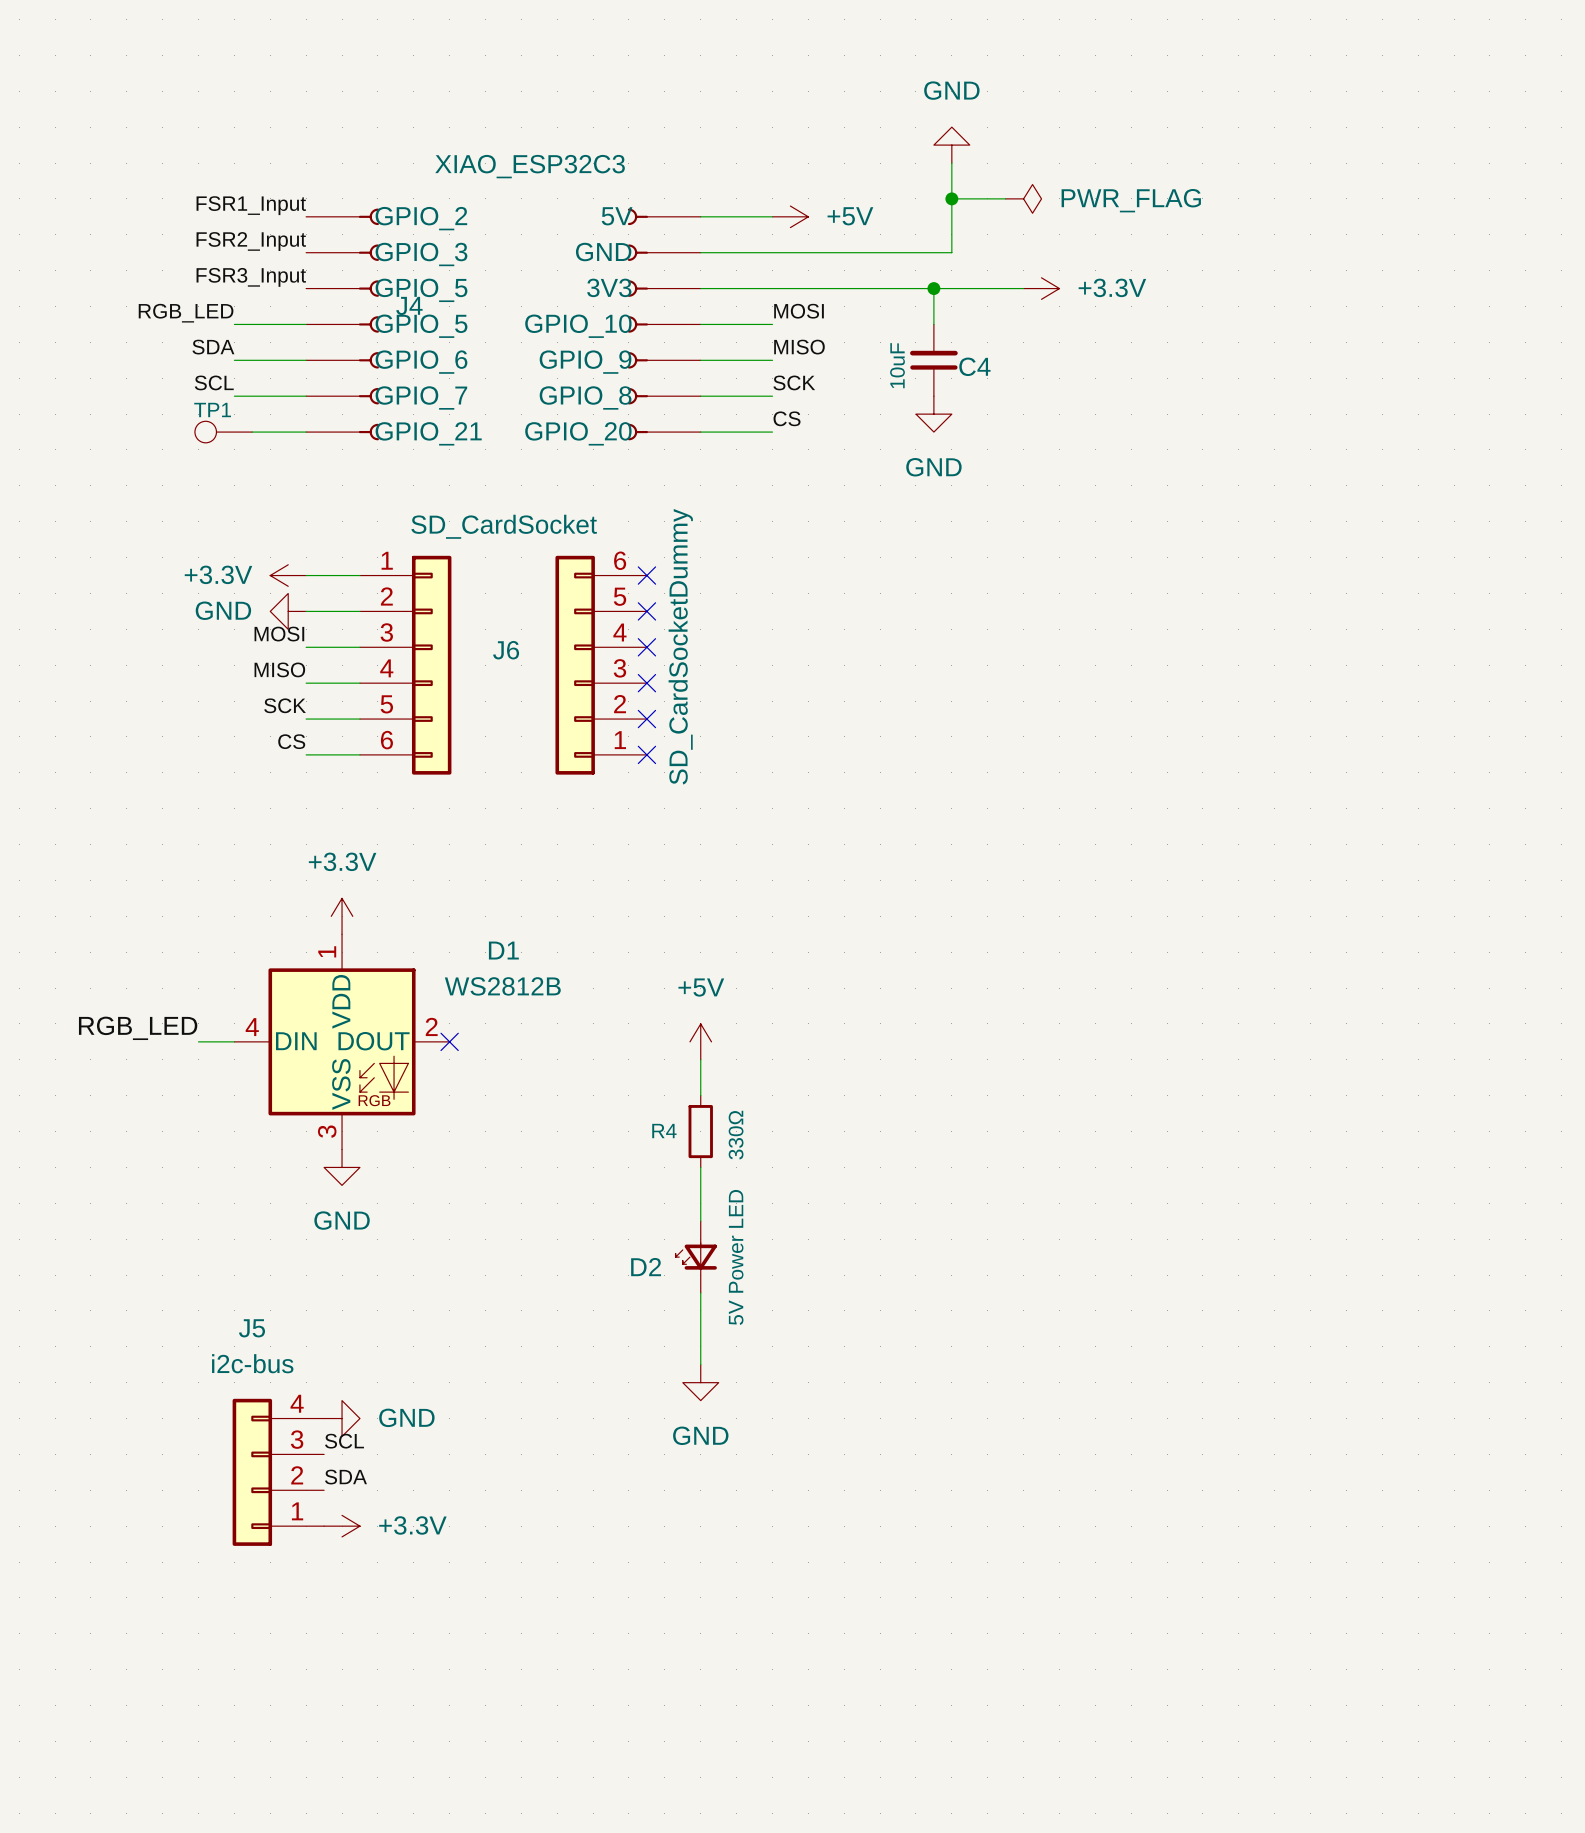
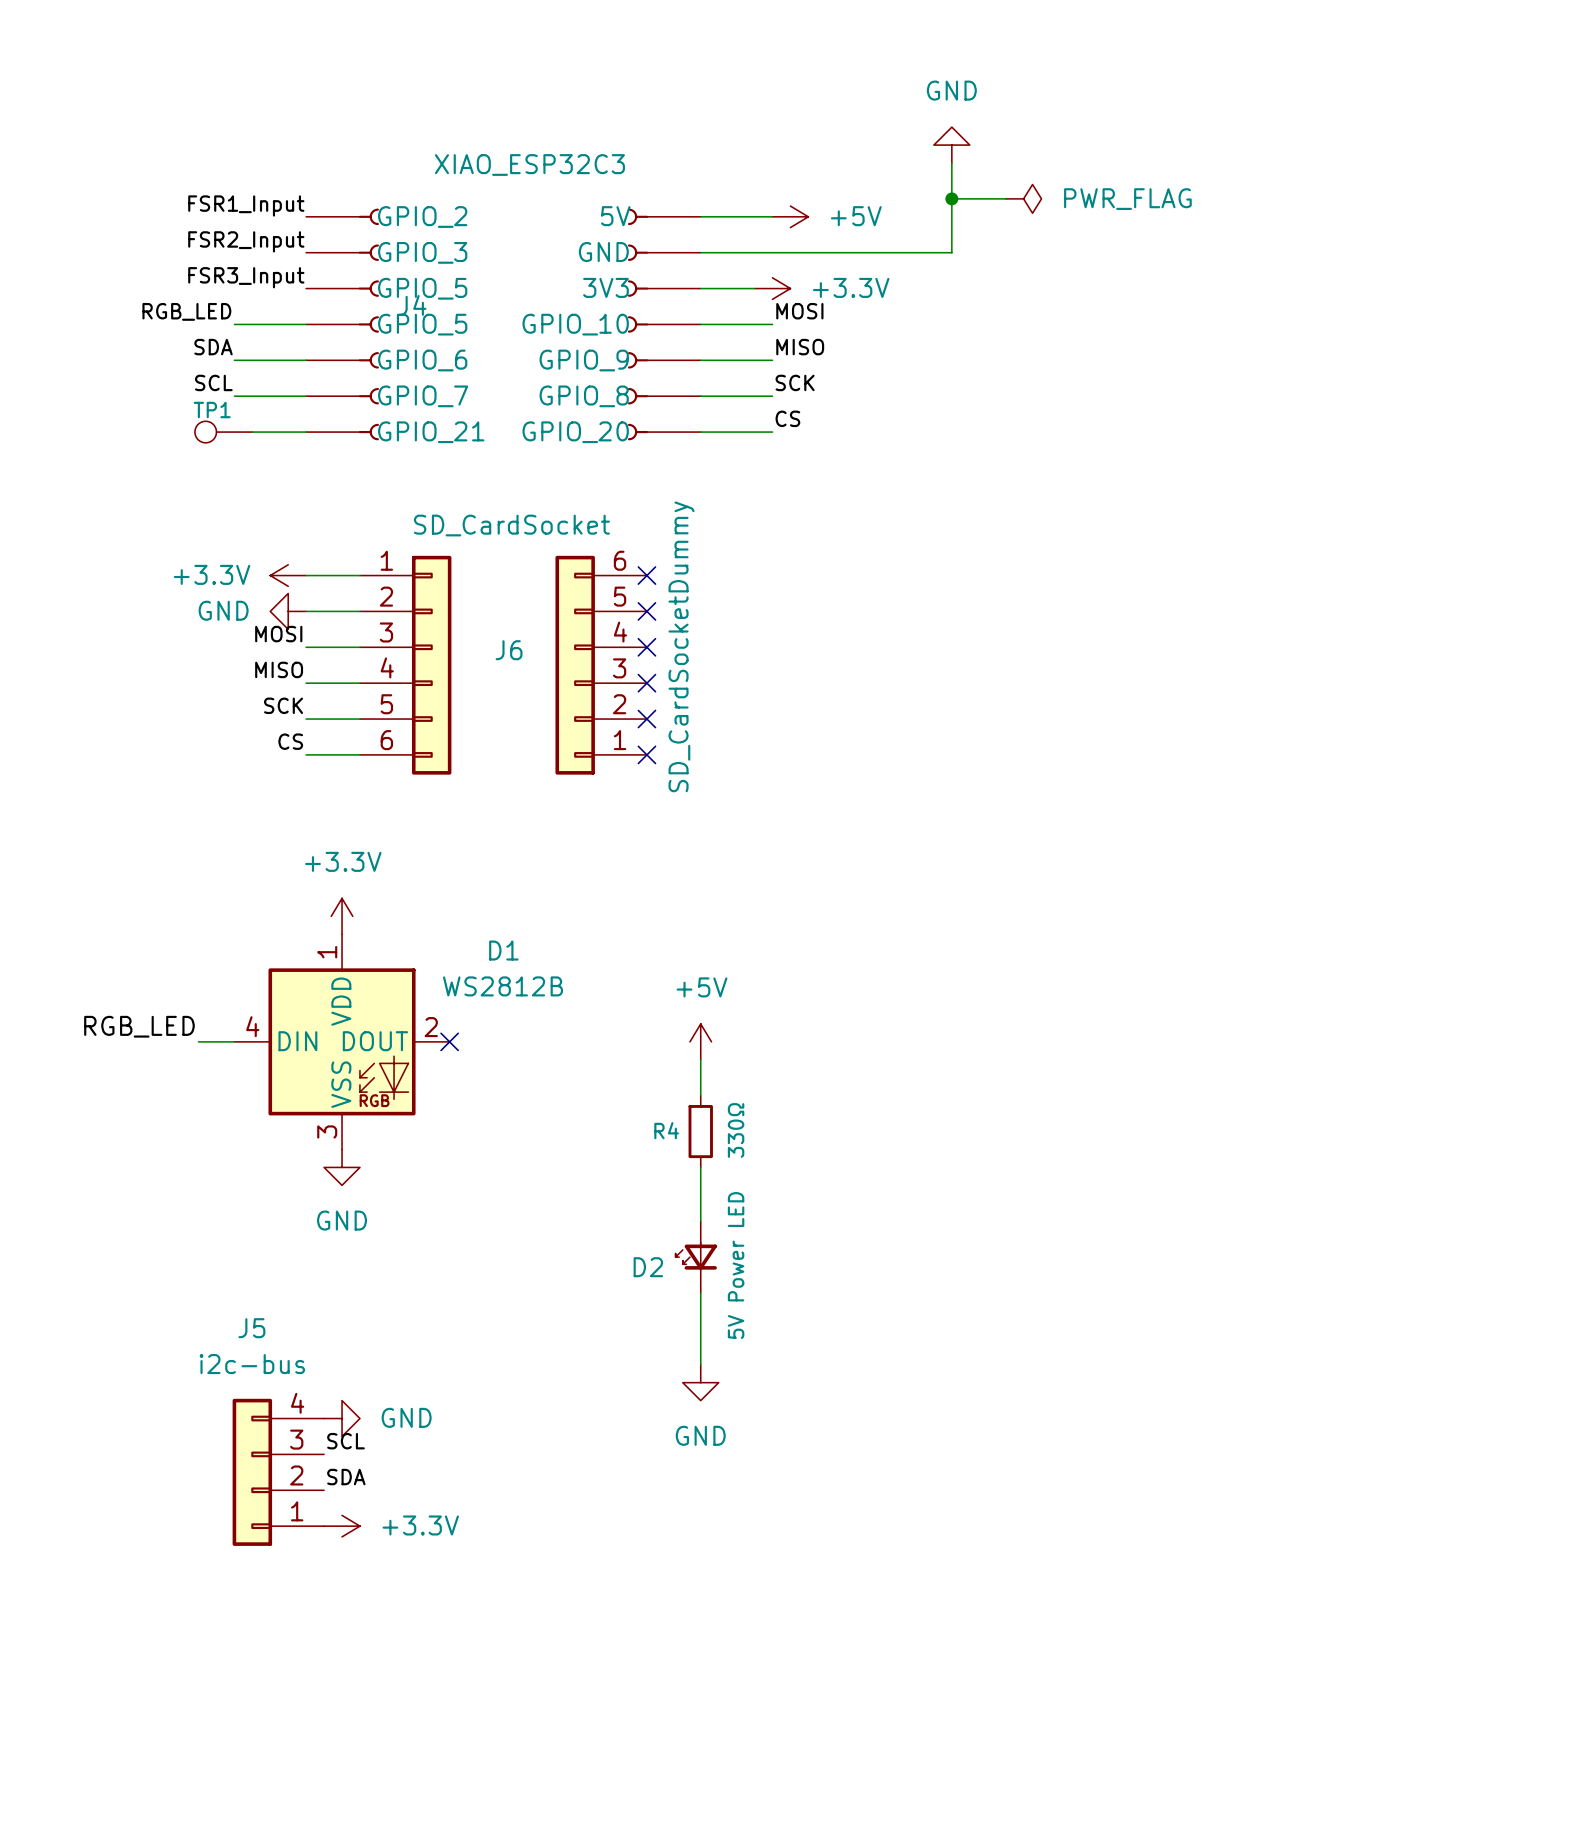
wire: (754, 288) (1023, 288) -> none
wire: (933, 288) (933, 324) -> none
junction: (933, 288) -> none
power symbol position: +3.3V (1041, 288) -> +3.3V (772, 288)
C4: 10uF (933, 360) -> none
power symbol: GND (933, 414) -> none

